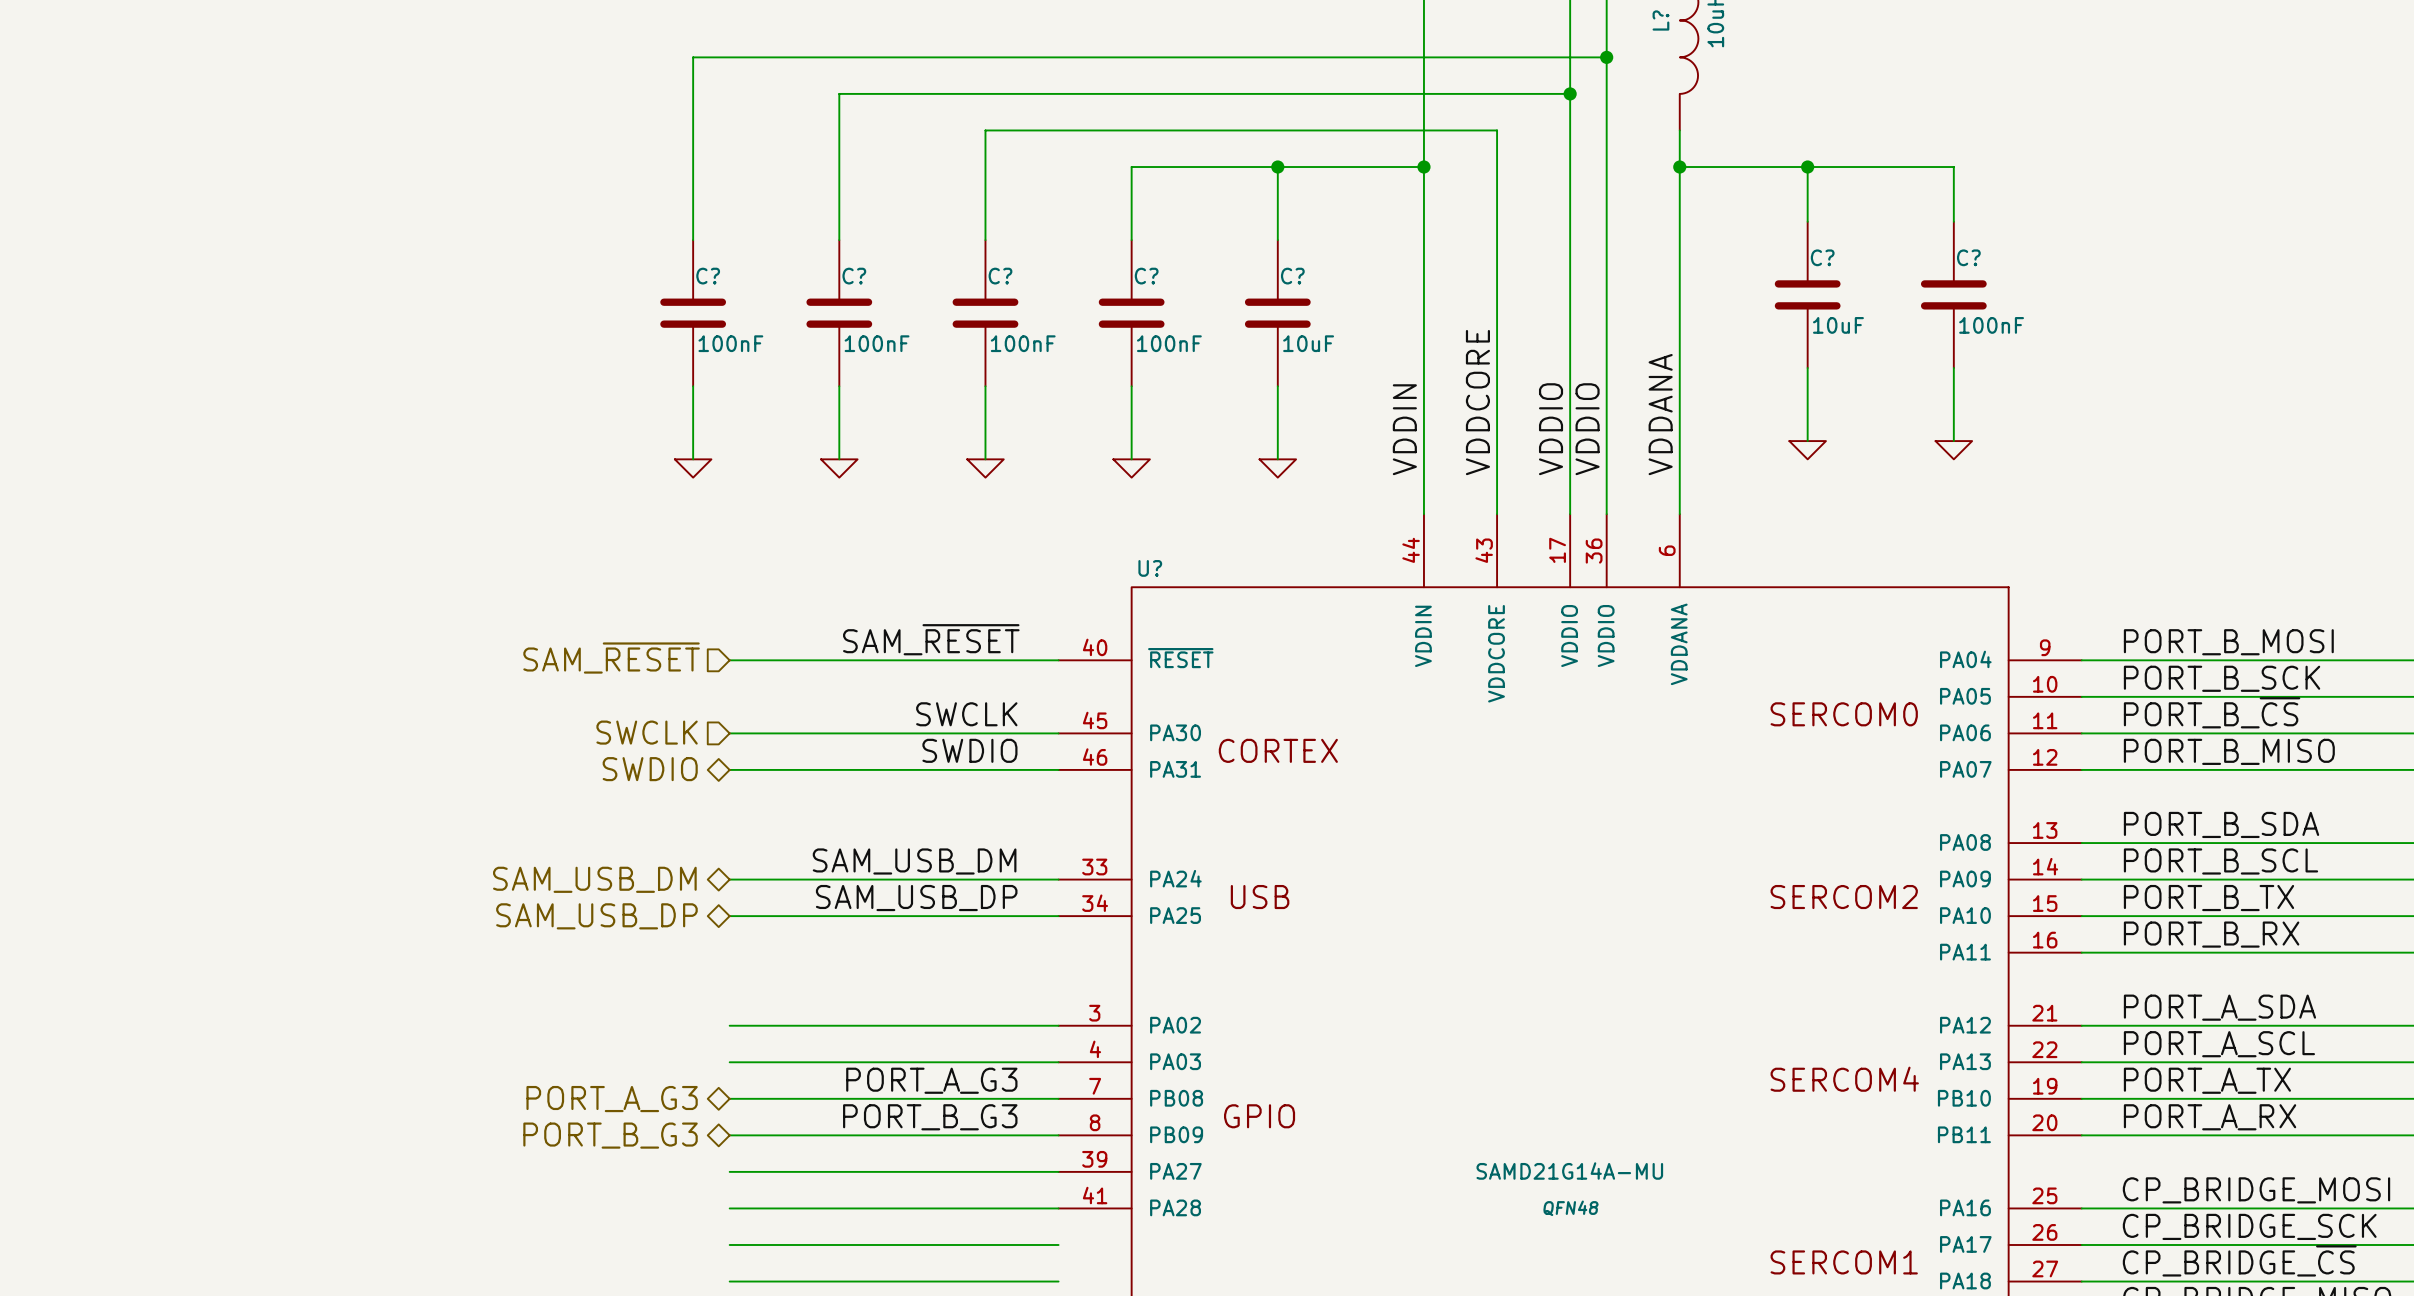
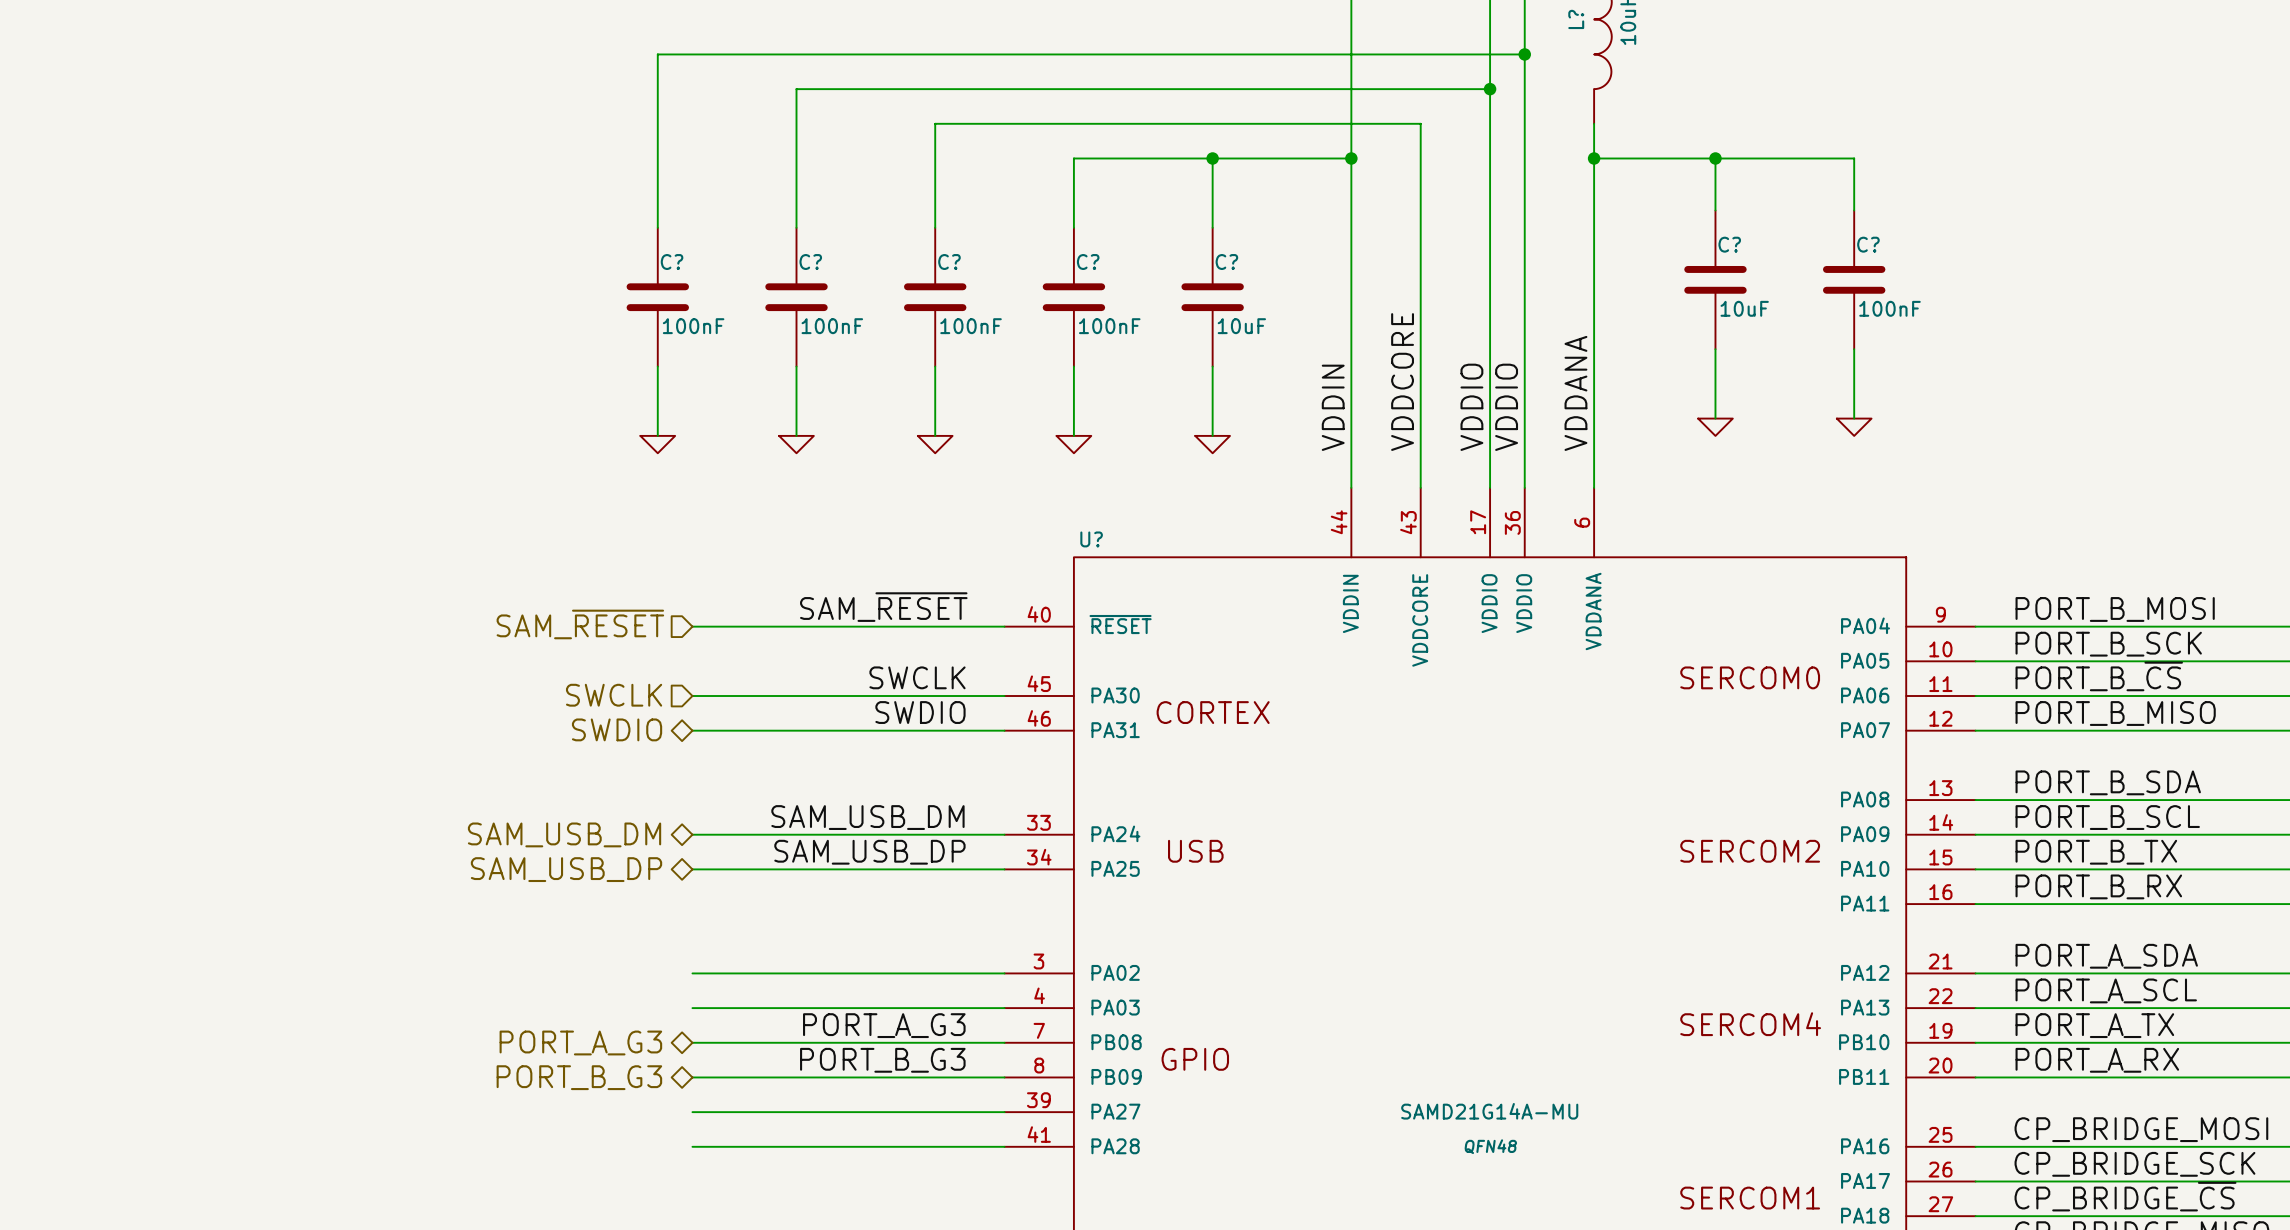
wire: (729, 1244) (1058, 1244) -> none
wire: (729, 1281) (1058, 1281) -> none

